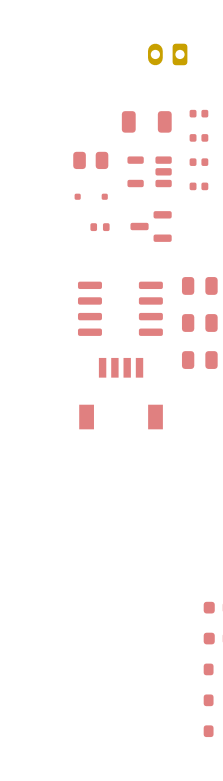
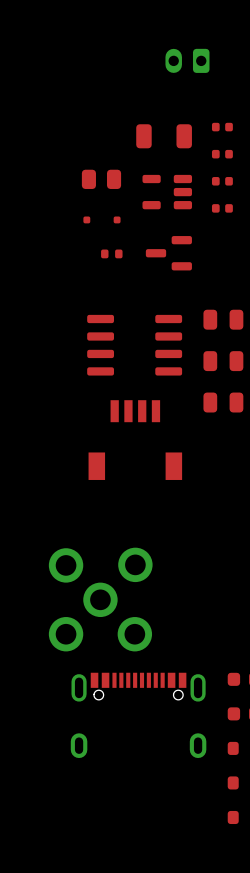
part: none -> (100, 599)
part: none -> (138, 715)

